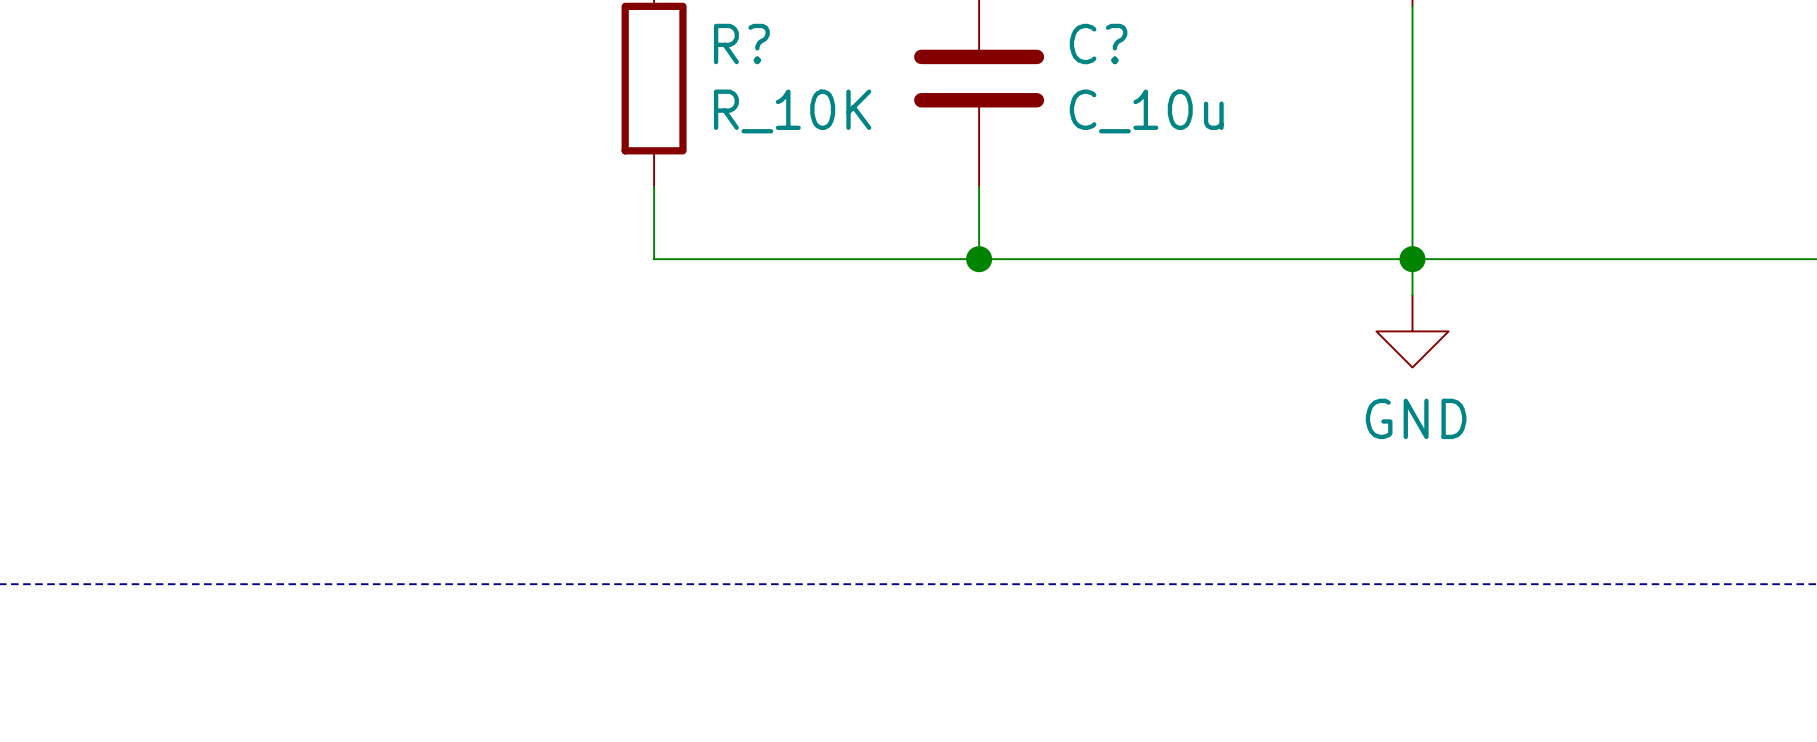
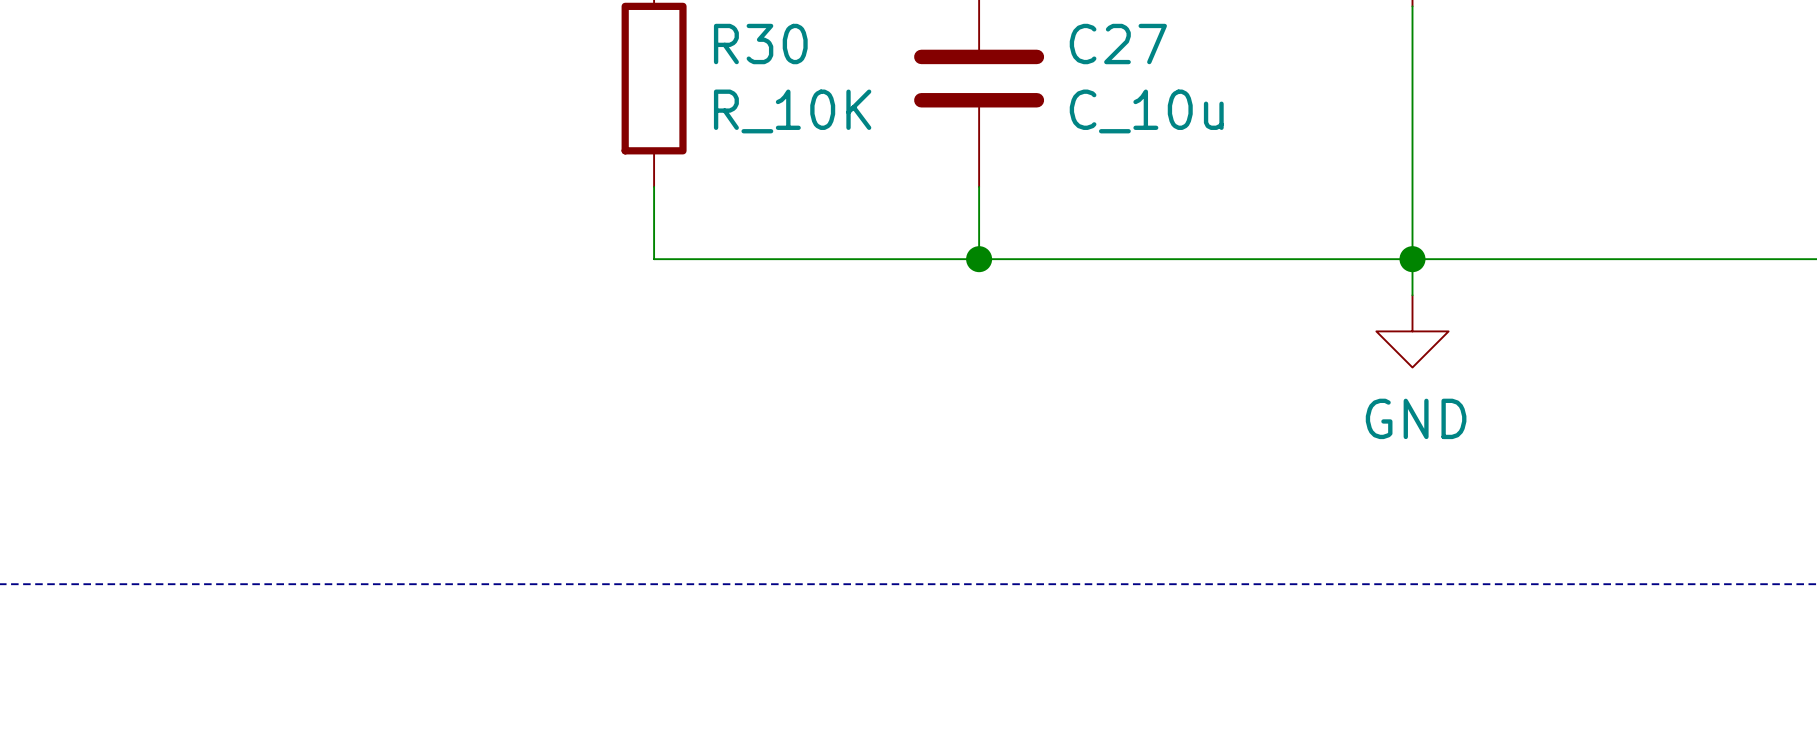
R? name: R? (741, 44) -> R30 (760, 44)
C? name: C? (1098, 44) -> C27 (1118, 44)

